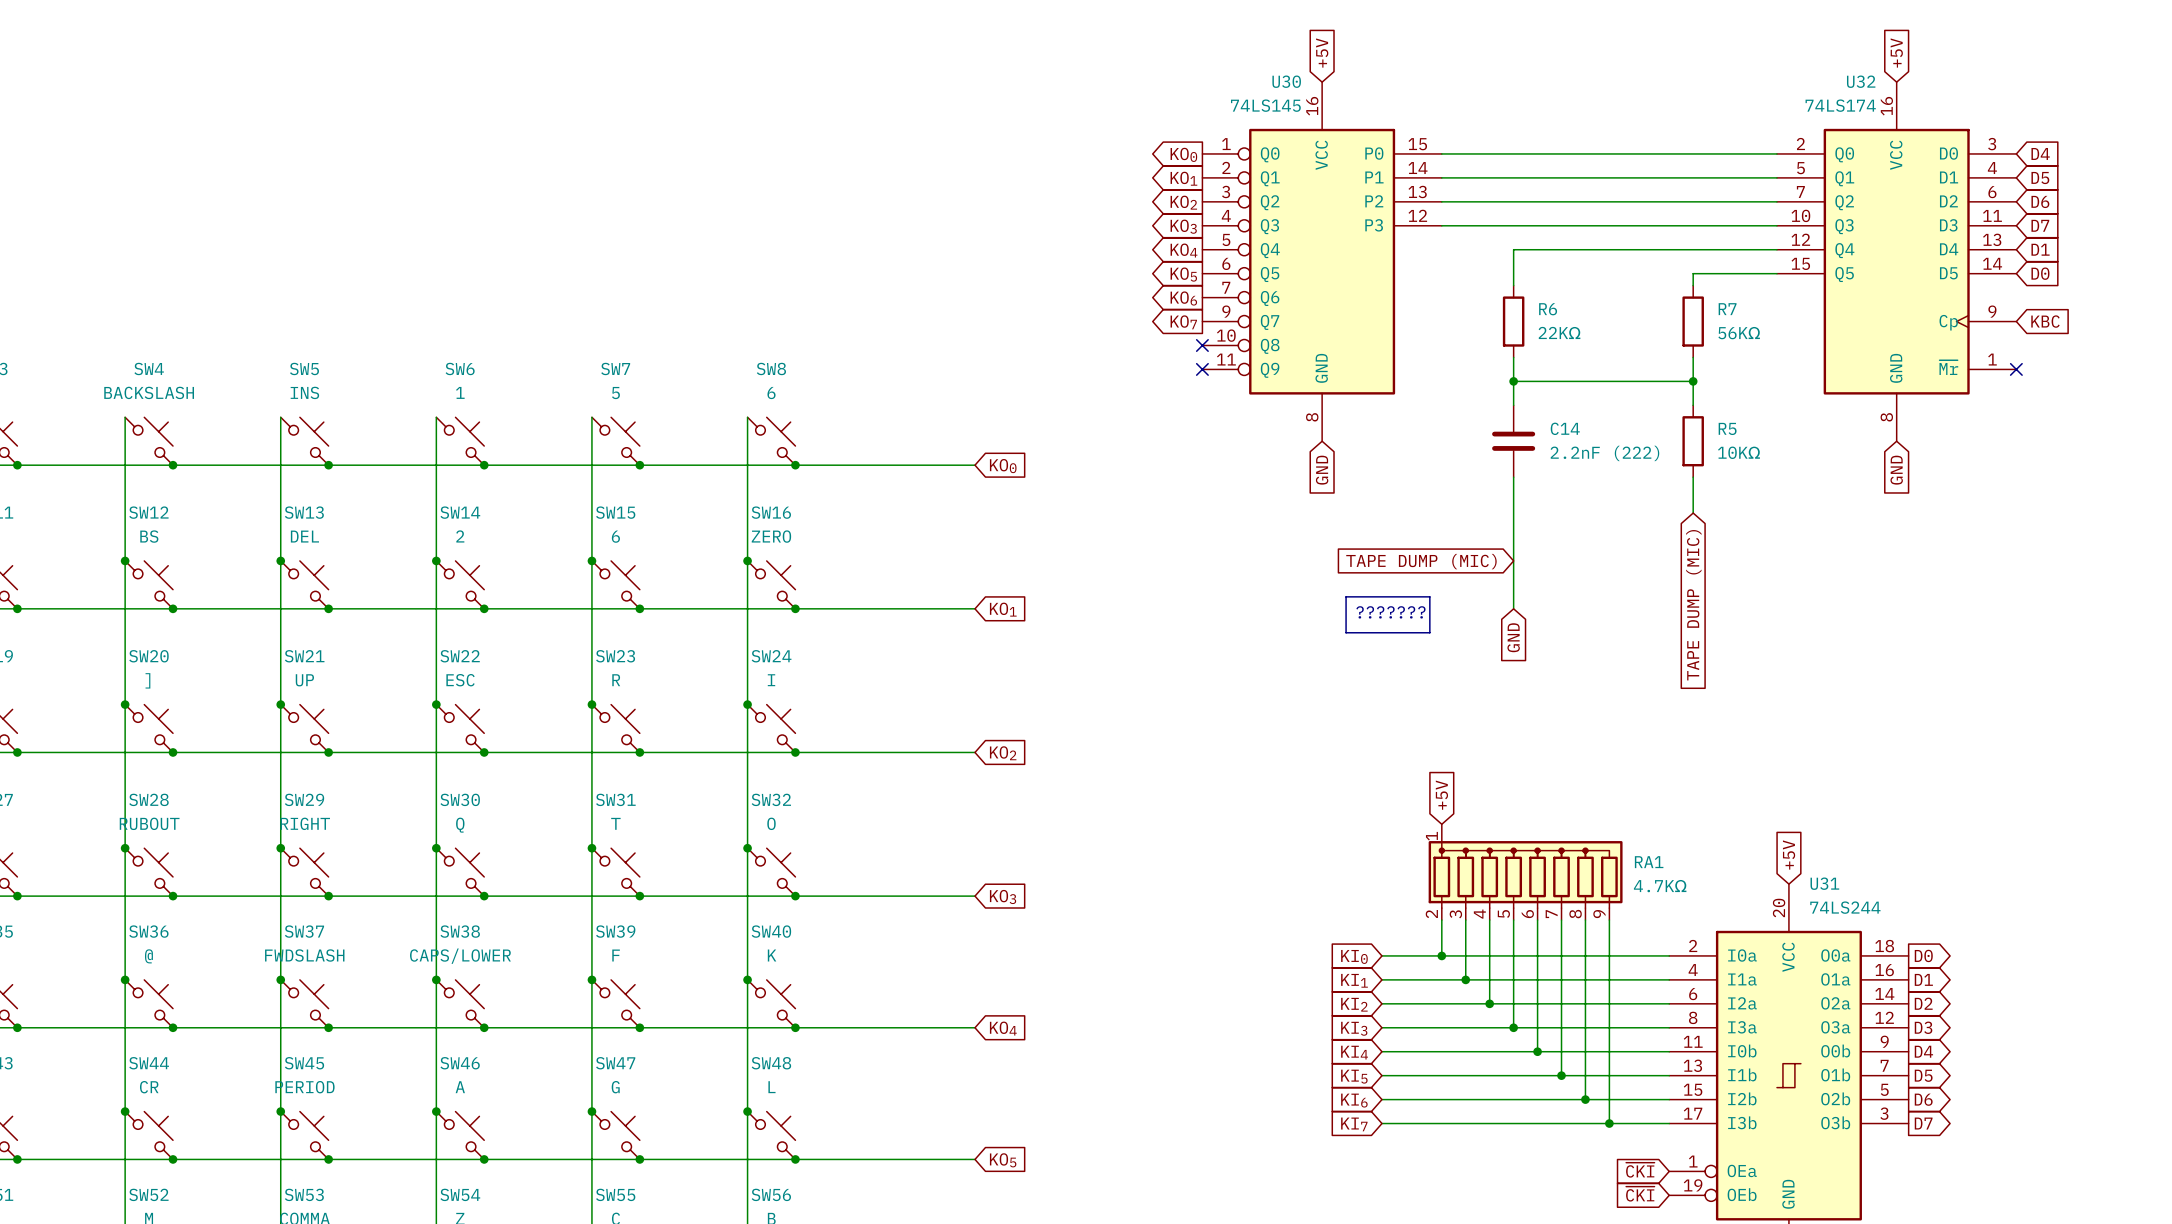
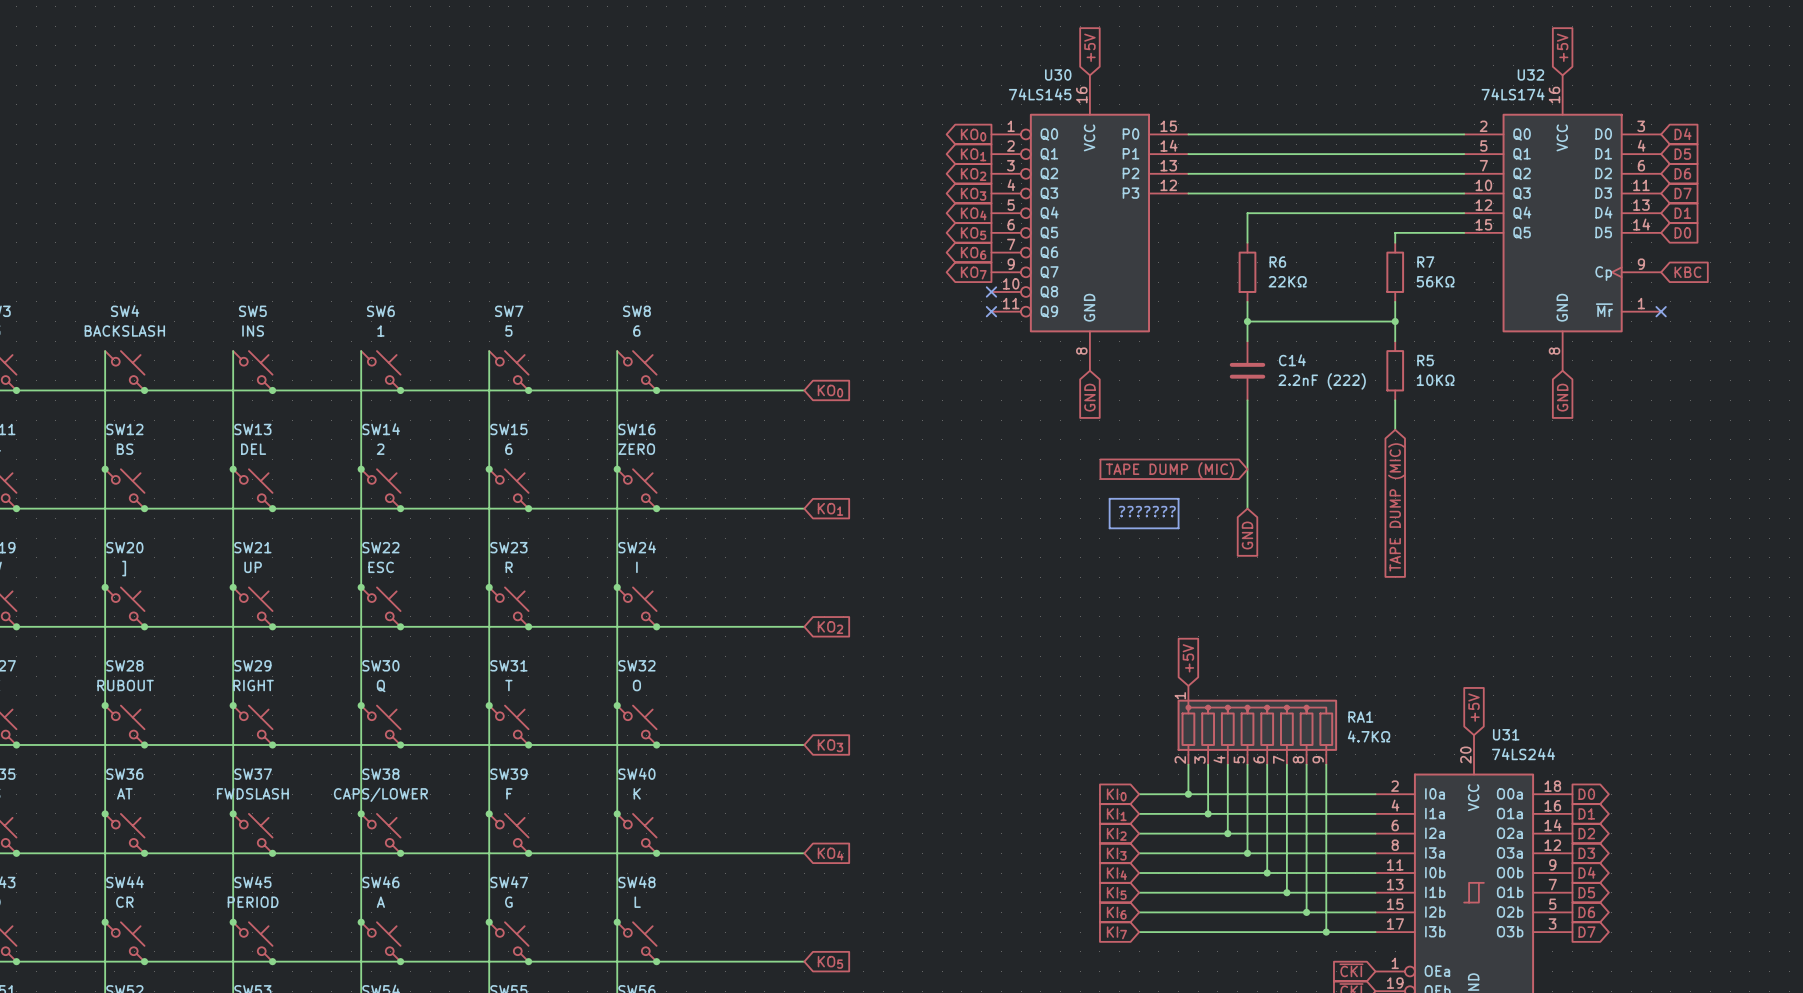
SW36 value: @ (148, 956) -> AT (124, 793)

